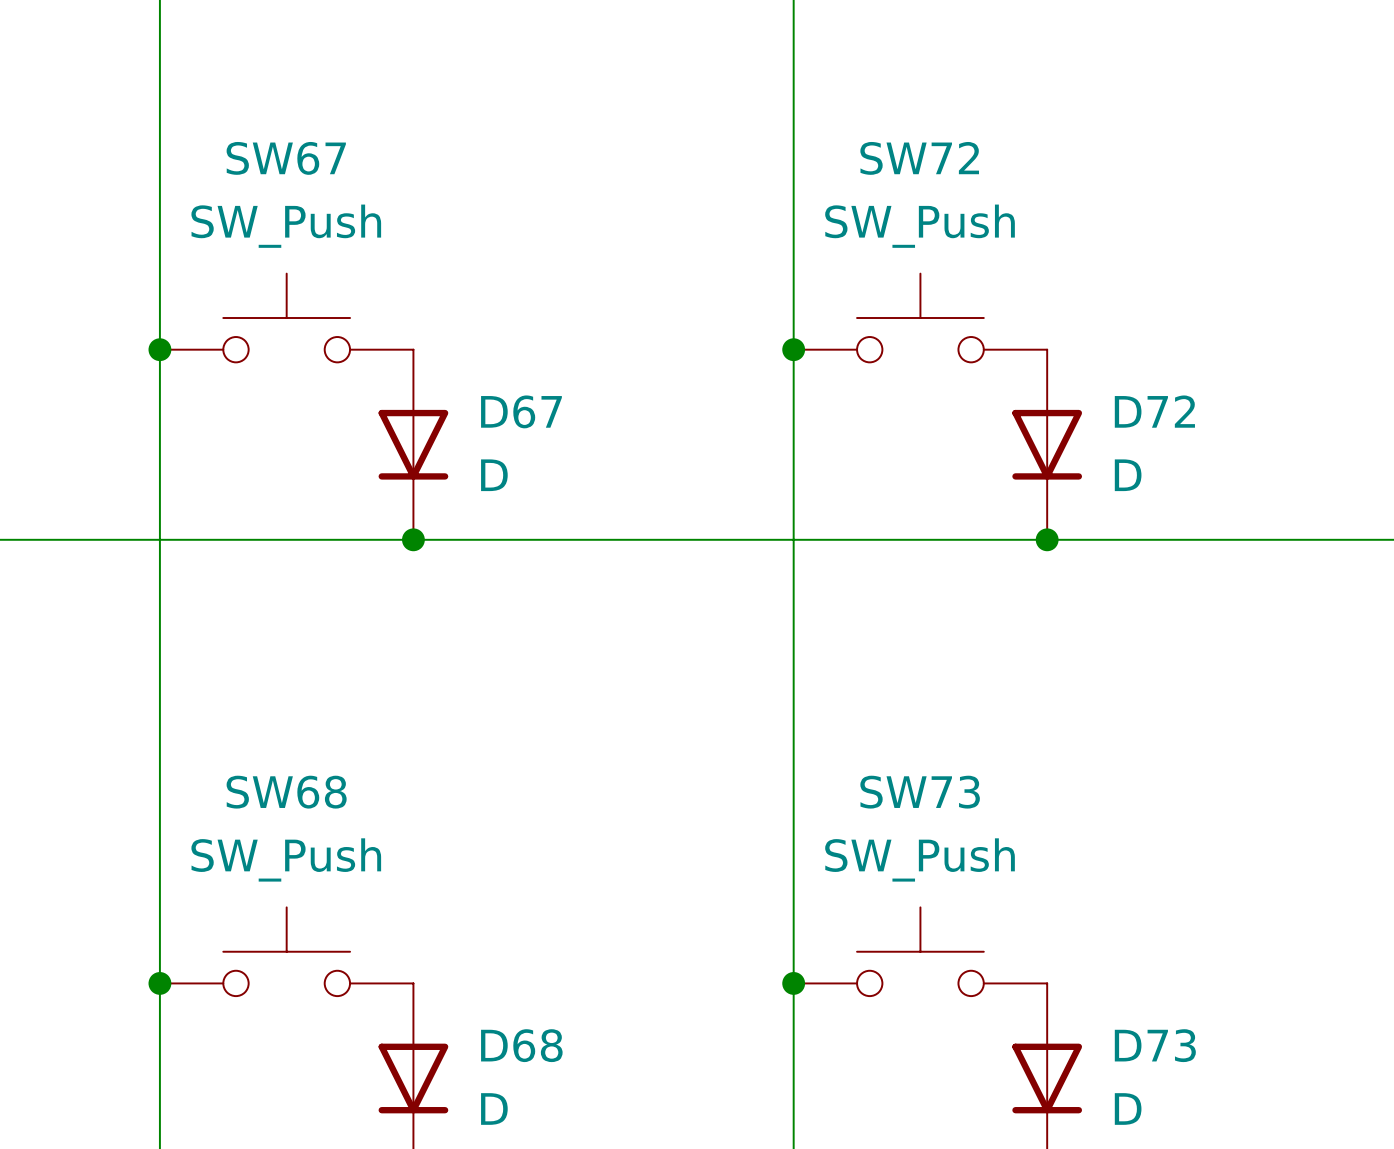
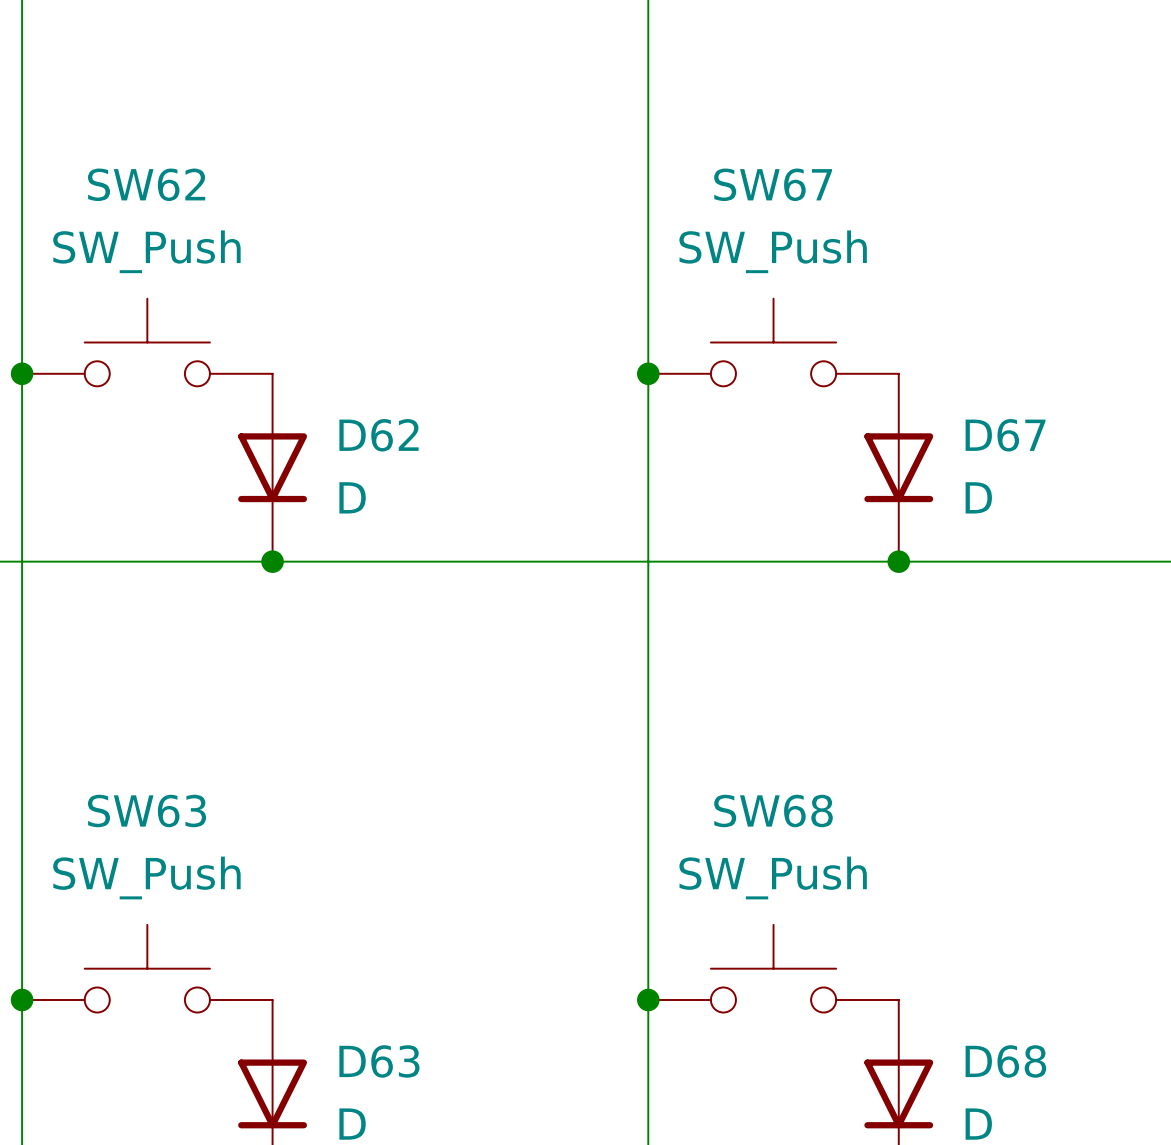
SW67 name: SW67 (286, 158) -> SW62 (146, 184)
SW72 name: SW72 (919, 158) -> SW67 (773, 184)
D67 name: D67 (521, 411) -> D62 (379, 435)
D72 name: D72 (1154, 411) -> D67 (1005, 435)
SW68 name: SW68 (286, 792) -> SW63 (147, 810)
SW73 name: SW73 (920, 792) -> SW68 (773, 810)
D68 name: D68 (521, 1045) -> D63 (379, 1061)
D73 name: D73 (1155, 1045) -> D68 (1005, 1061)

